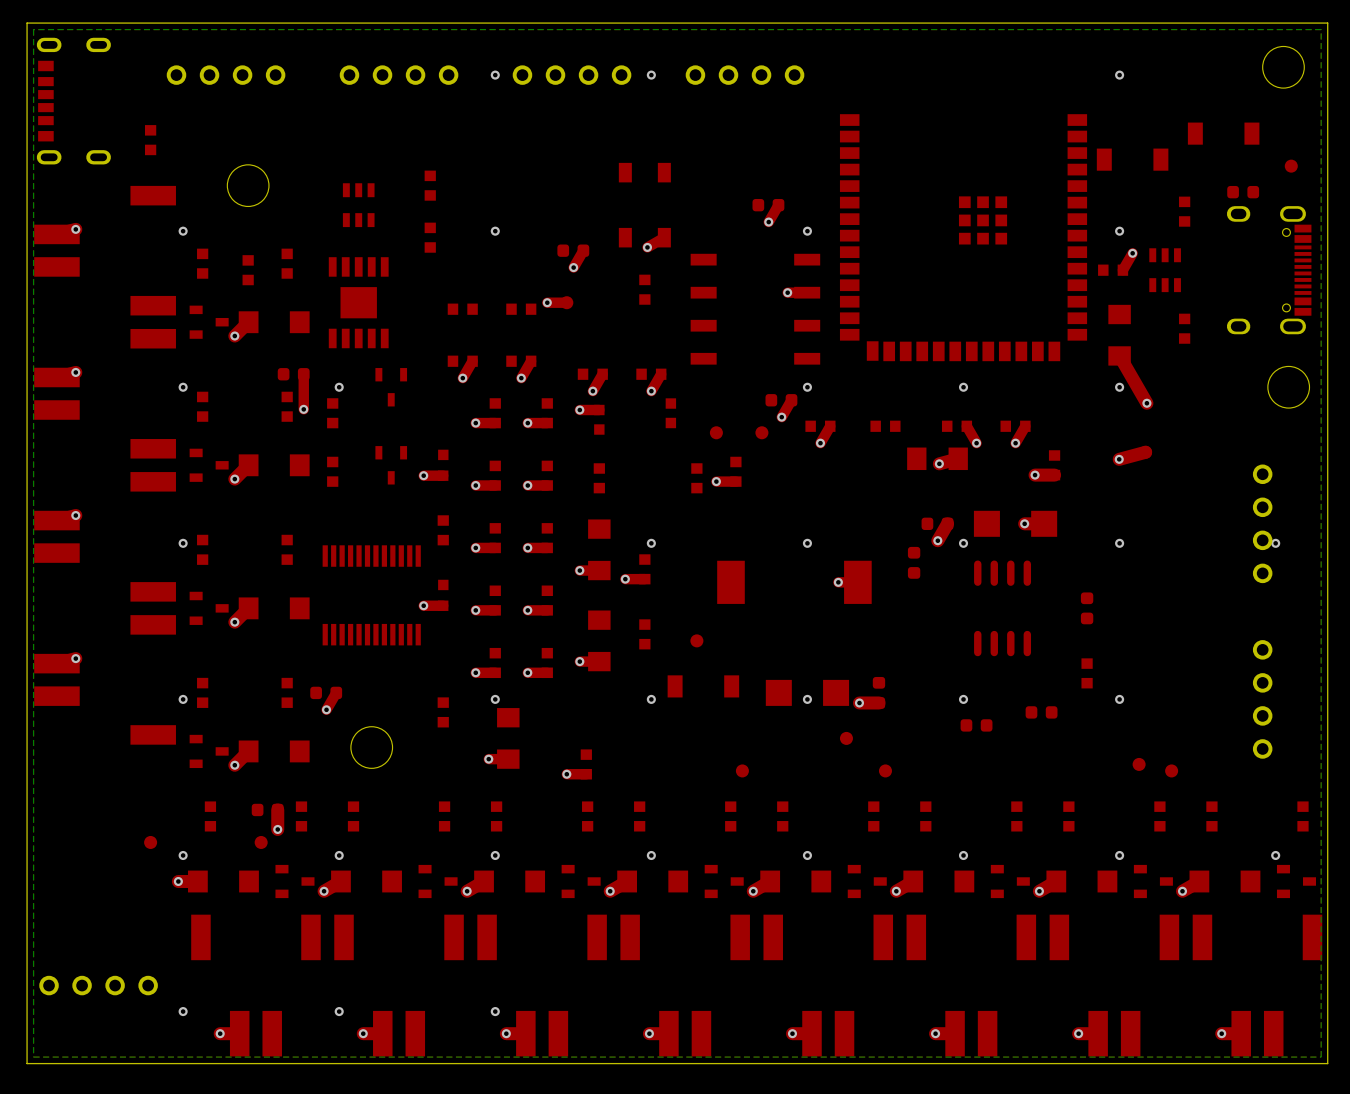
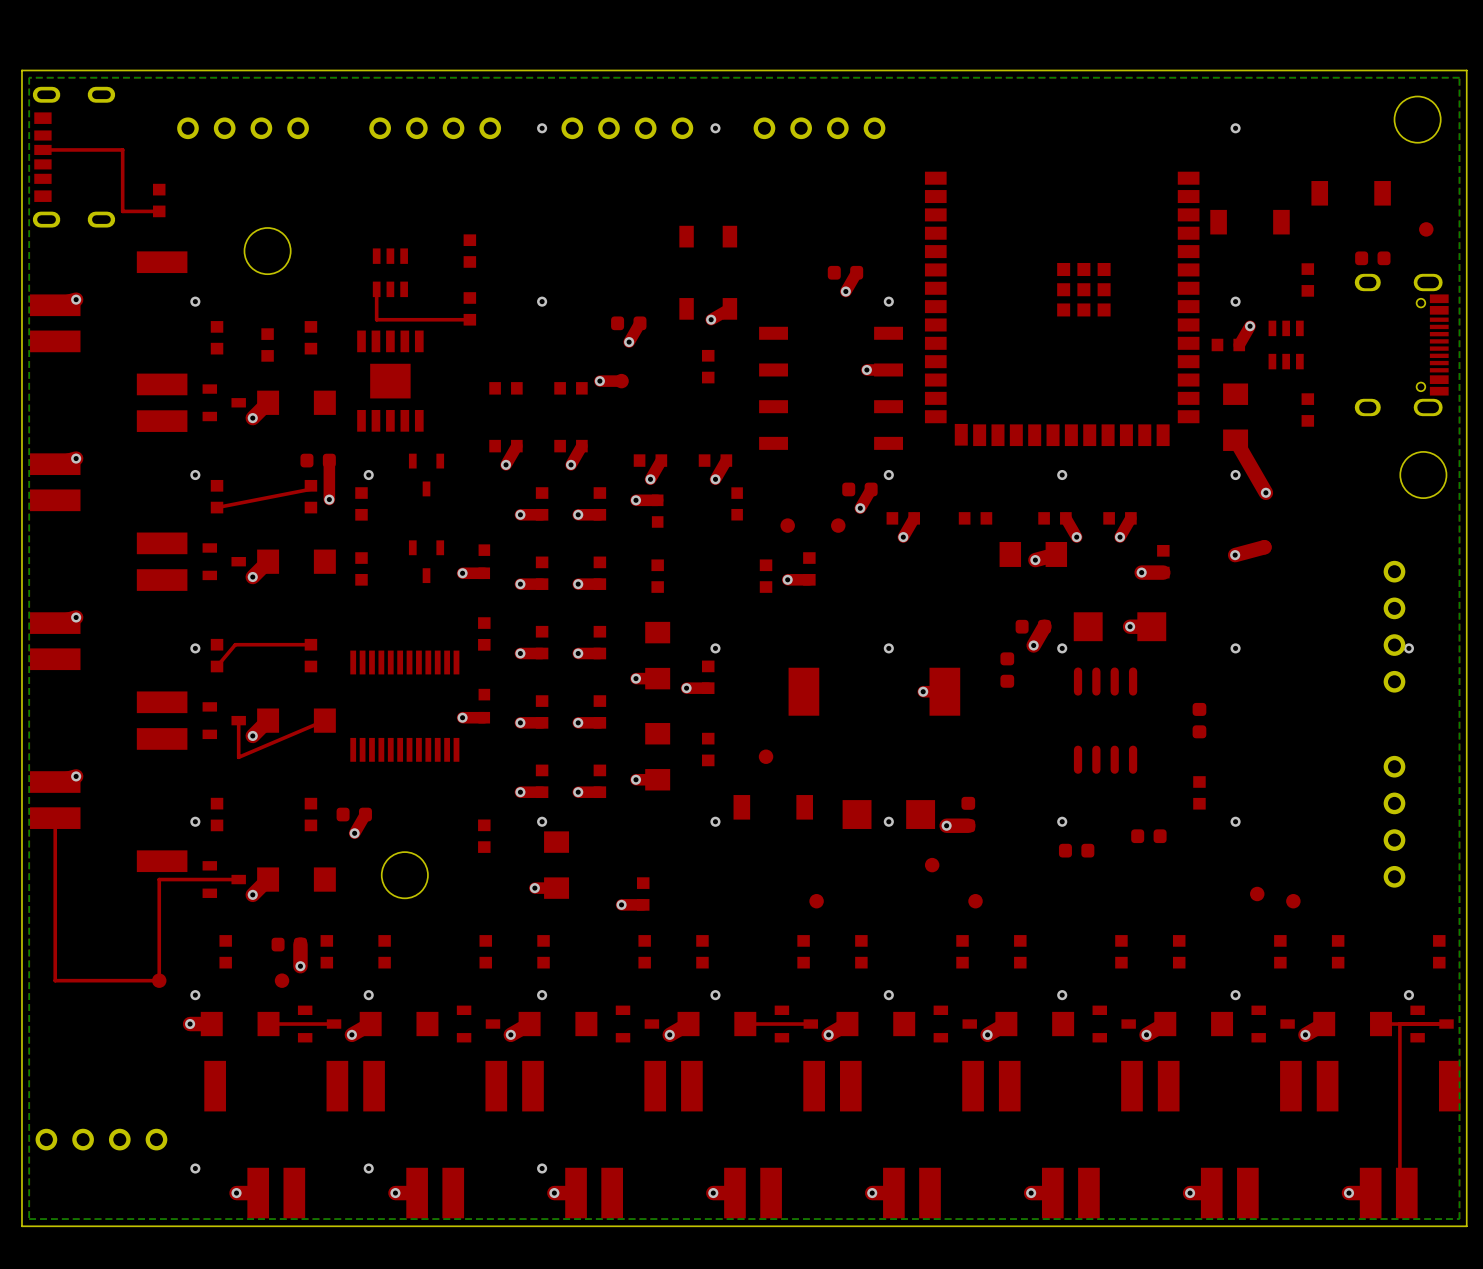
top track: none -> (42, 149) (122, 149) (122, 211) (159, 211)
top track: none -> (376, 289) (376, 319) (469, 319)
top track: none -> (310, 485) (310, 489) (217, 507)
top track: none -> (310, 644) (235, 644) (217, 666)
top track: none -> (324, 720) (238, 757) (238, 720)
top track: none -> (55, 818) (55, 980) (159, 980) (159, 879) (238, 879)
top track: none -> (334, 1024) (268, 1024)
top track: none -> (810, 1024) (745, 1024)
top track: none -> (1399, 1024) (1399, 1193) (1406, 1193)
top track: none -> (1446, 1024) (1380, 1024)

